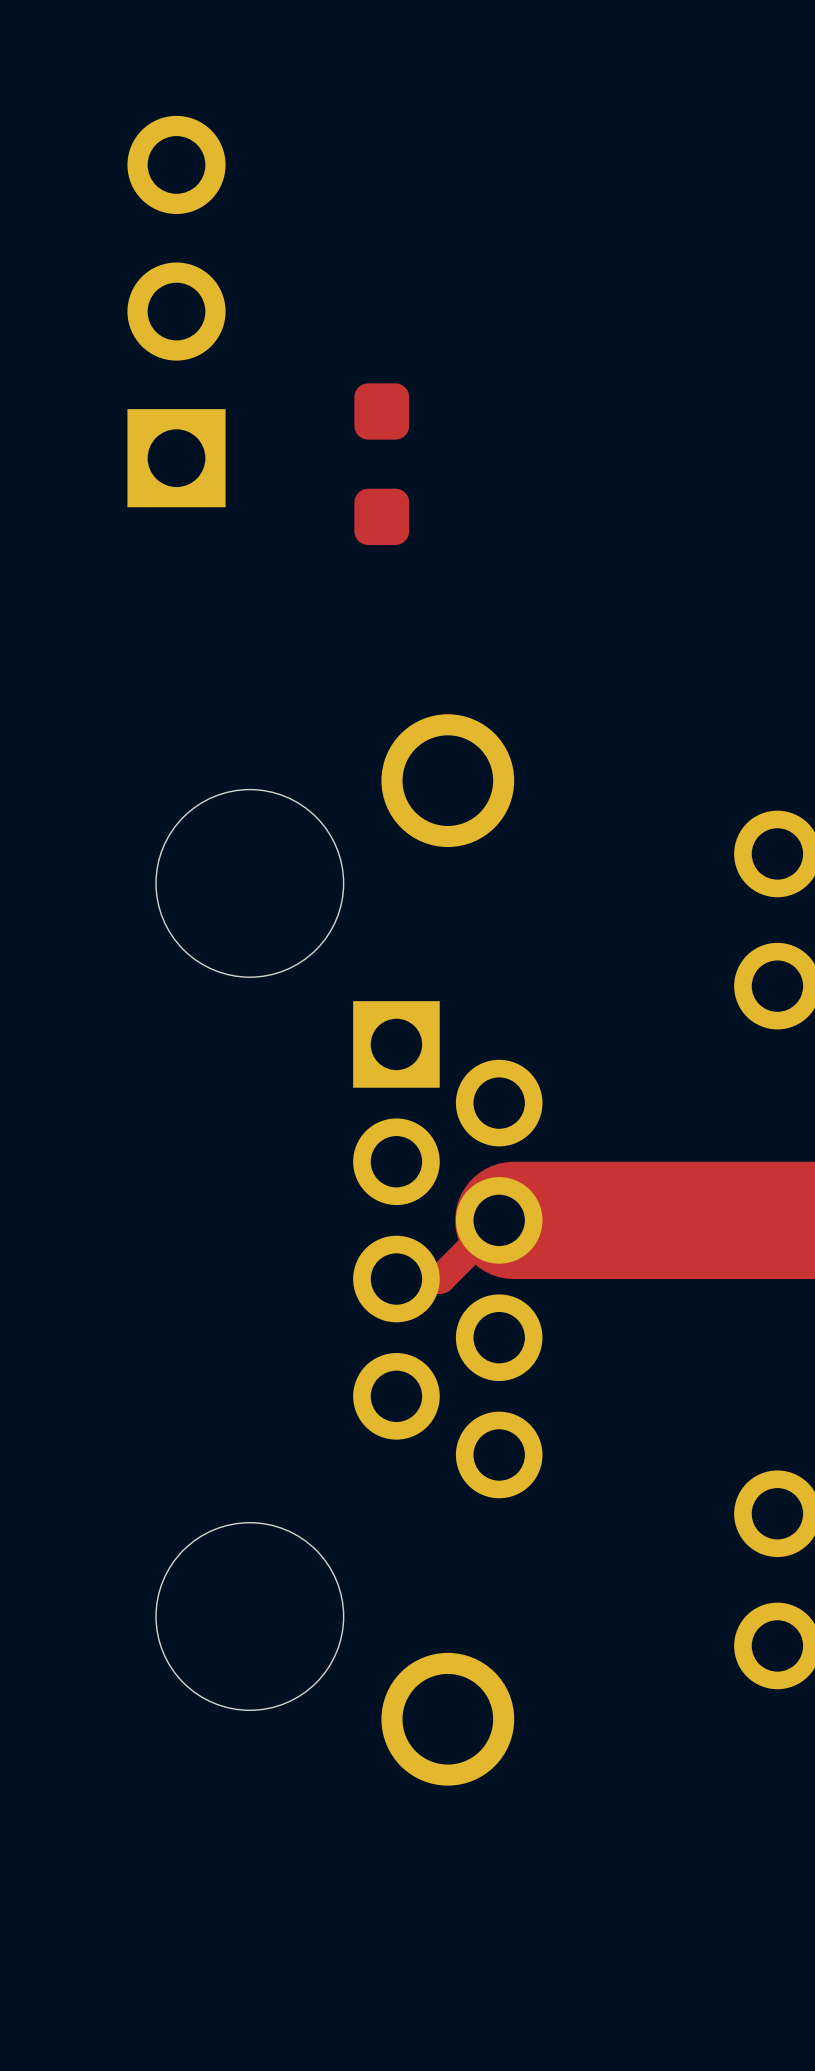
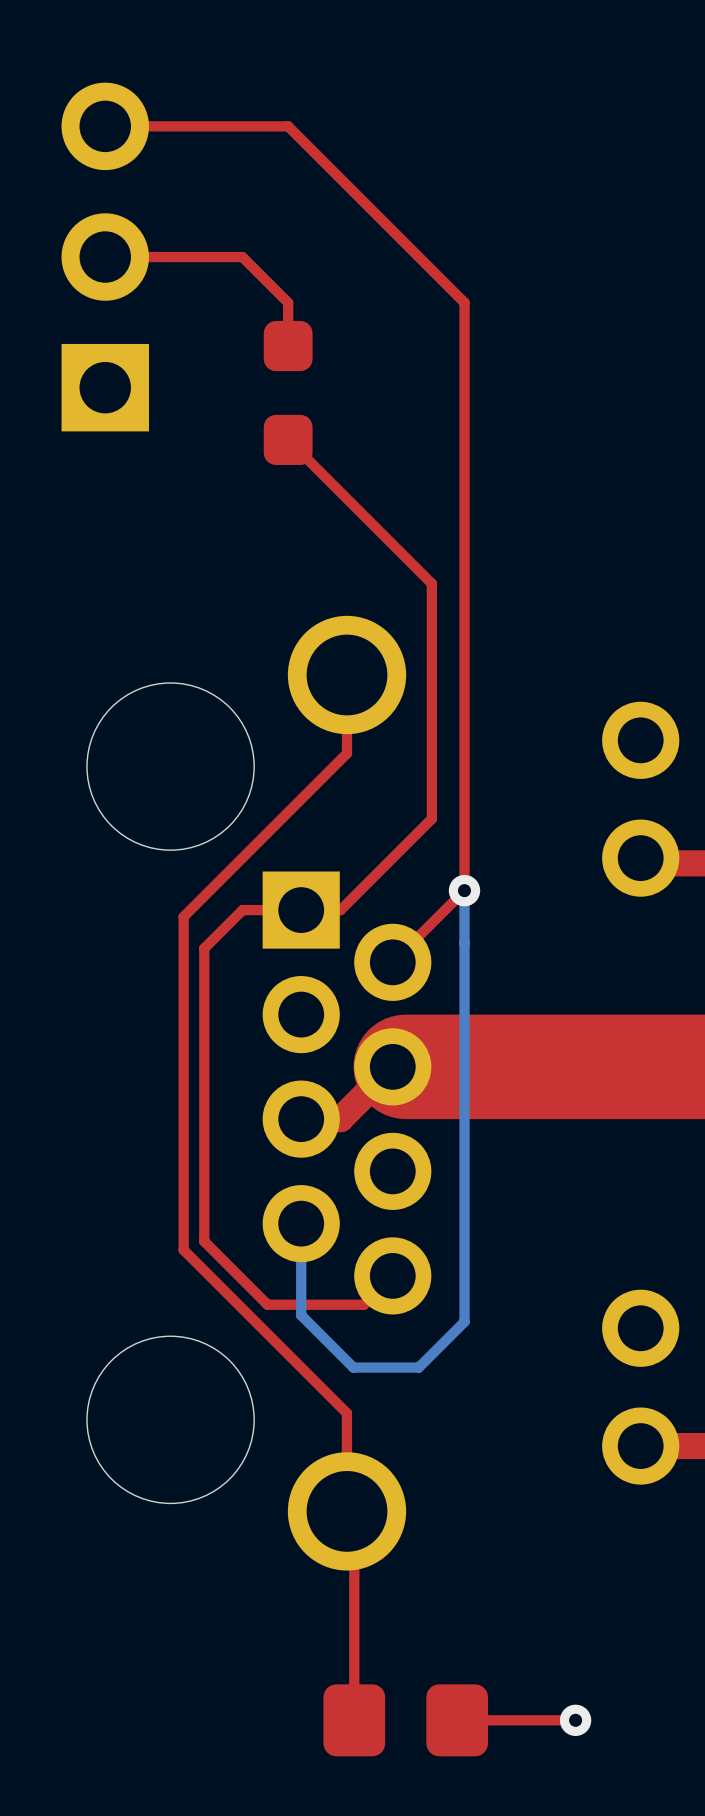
top track: none -> (105, 126) (288, 126) (464, 302) (464, 890) (392, 962)
top track: none -> (105, 257) (242, 257) (288, 302) (288, 346)
top track: none -> (288, 439) (431, 583) (431, 818) (340, 910) (242, 910) (204, 948) (204, 1241) (267, 1304) (363, 1304) (392, 1275)
top track: none -> (347, 675) (347, 753) (183, 916) (183, 1249) (346, 1413) (346, 1511) (354, 1518) (354, 1720)
bottom track: none -> (464, 890) (464, 942)
via: none -> (464, 890)
bottom track: none -> (464, 942) (464, 1321) (418, 1367) (353, 1367) (301, 1315) (301, 1223)
part: none -> (405, 1720)
top track: none -> (575, 1720) (457, 1720)
via: none -> (575, 1720)

